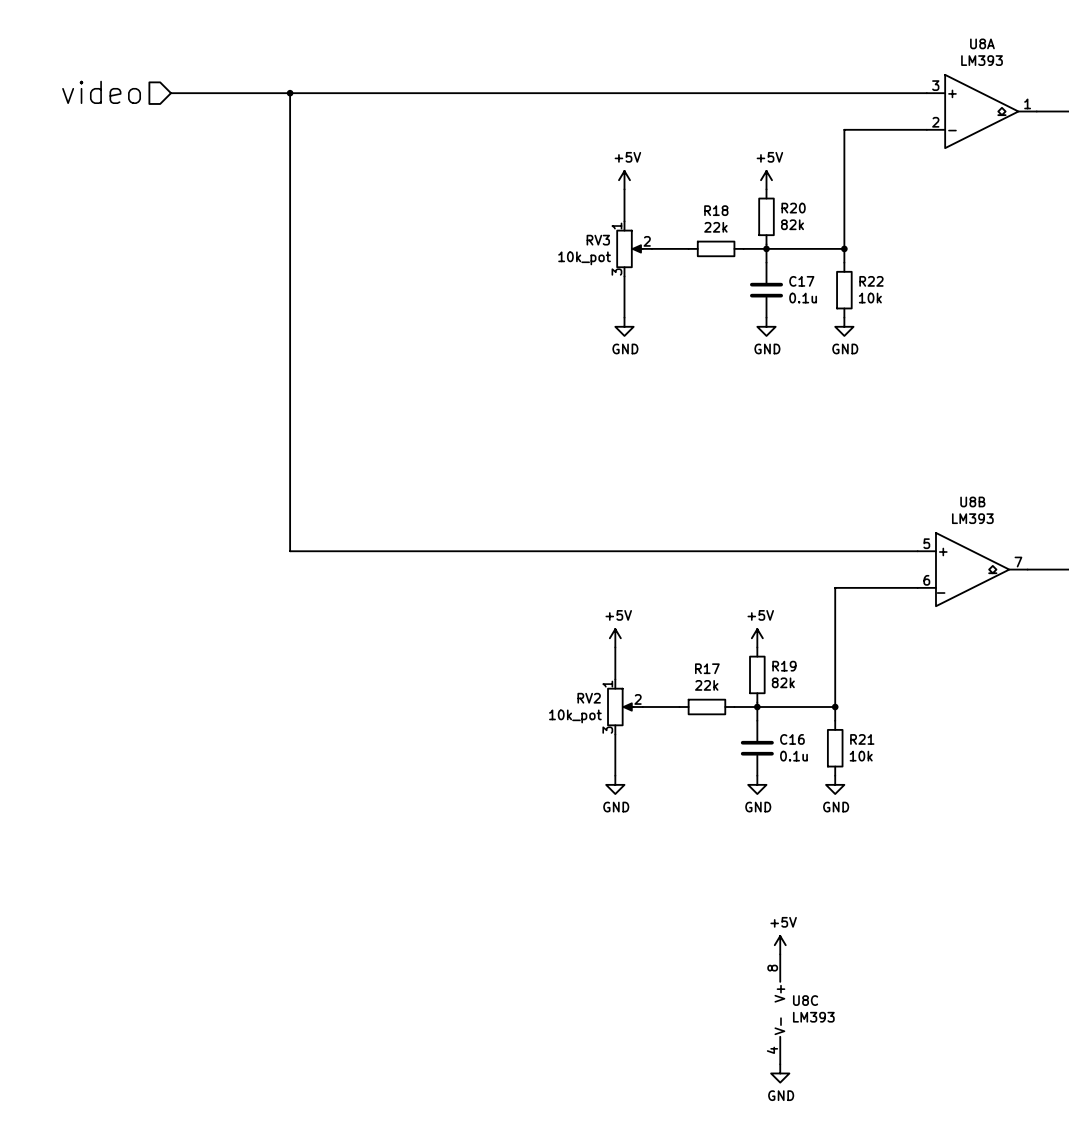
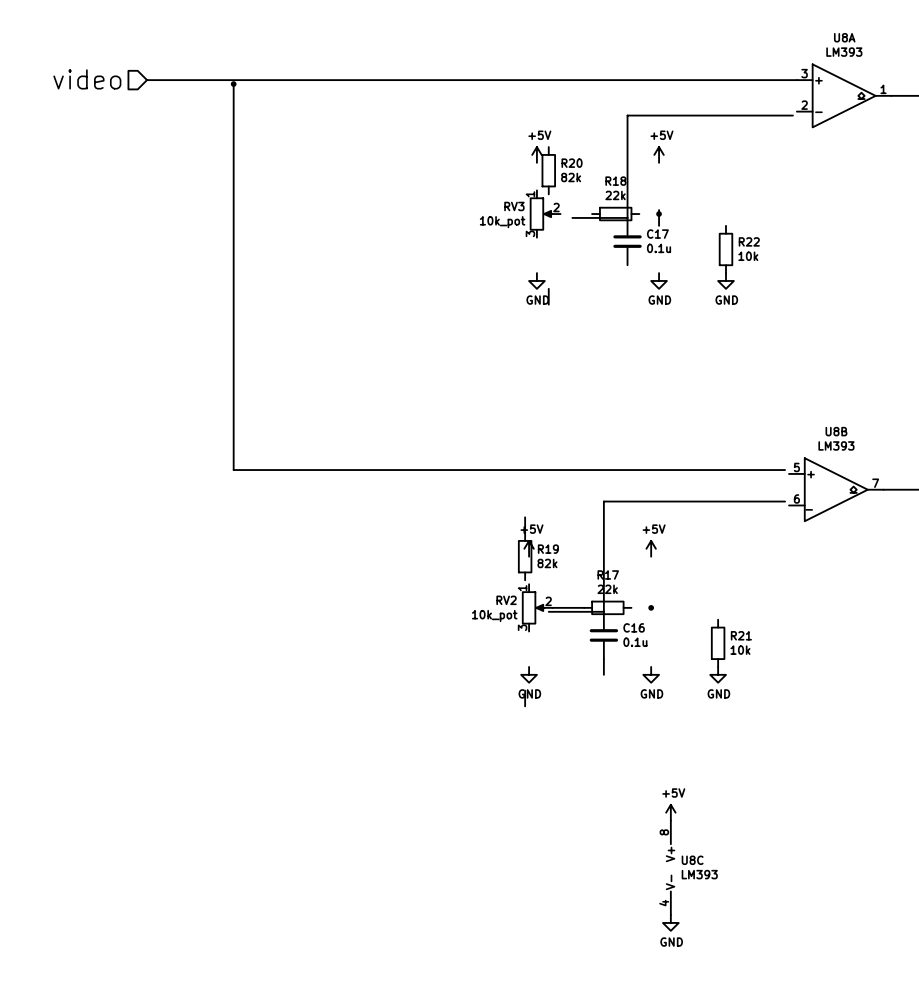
wire: (290, 93) (290, 551) (917, 551) -> none
junction position: (290, 93) -> (233, 84)
wire: none -> (233, 84) (233, 470) (785, 470)
wire: (926, 129) (844, 129) (844, 262) -> none
wire: none -> (792, 115) (627, 115) (627, 217) (572, 217)
wire: (624, 189) (624, 221) -> none
R20 position: (766, 216) -> (548, 170)
wire: (651, 248) (688, 248) -> none
wire: (743, 248) (844, 248) -> none
junction: (844, 248) -> none
wire: (624, 276) (624, 317) -> none
C17 position: (766, 290) -> (627, 241)
wire: none -> (548, 288) (548, 304)
wire: none -> (785, 501) (603, 501) (603, 611) (548, 611)
wire: (917, 587) (835, 587) (835, 707) -> none
wire: none -> (525, 517) (525, 533)
wire: (615, 647) (615, 679) -> none
R19 position: (757, 674) -> (525, 556)
wire: (757, 702) (757, 720) -> (603, 659) (603, 674)
wire: (734, 707) (835, 707) -> none
wire: (835, 707) (835, 720) -> none
junction: (835, 707) -> none
wire: (615, 734) (615, 775) -> none
C16 position: (757, 748) -> (603, 635)
wire: none -> (525, 690) (525, 706)

